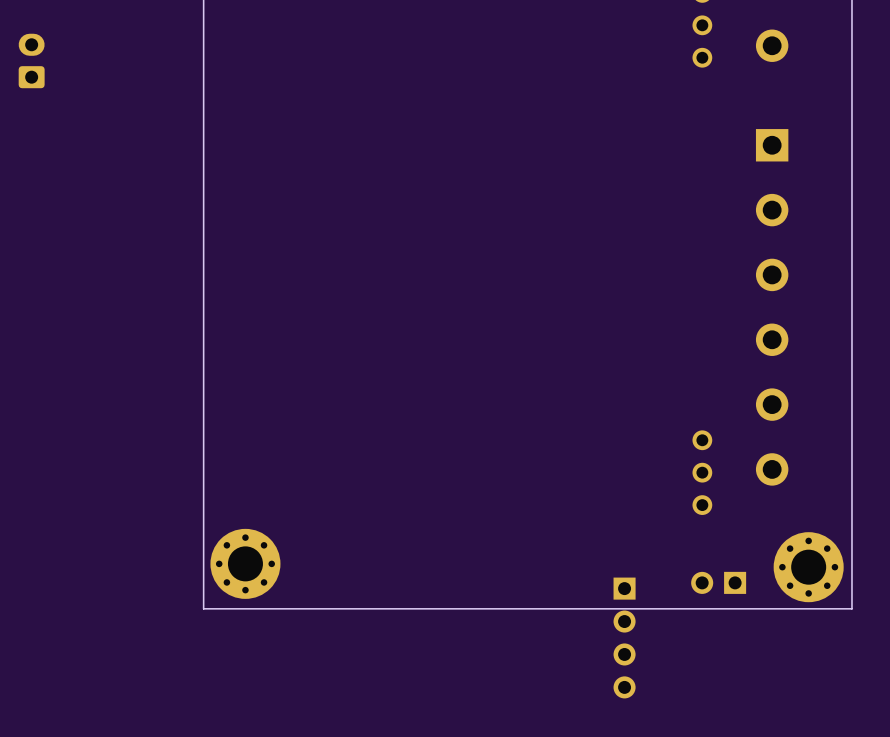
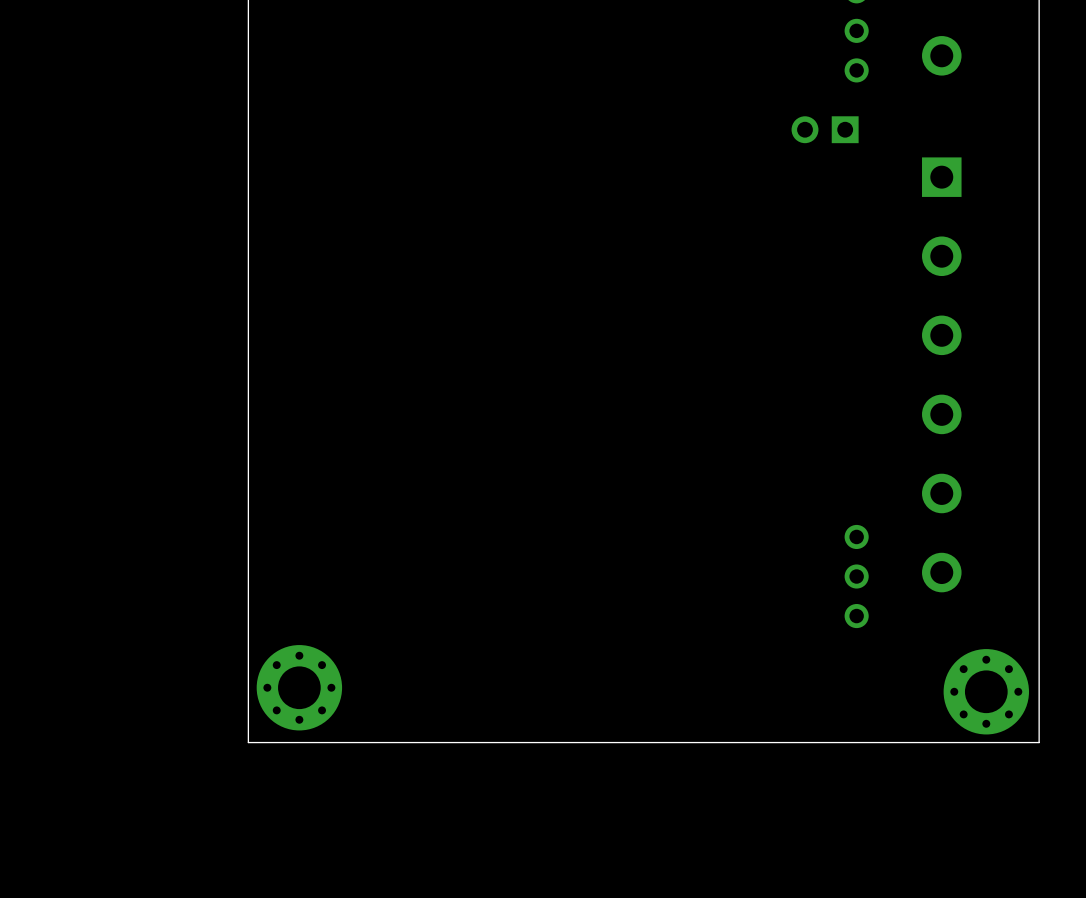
part: (31, 60) -> none
part: none -> (825, 129)
part: (718, 582) -> none
part: (624, 638) -> none

